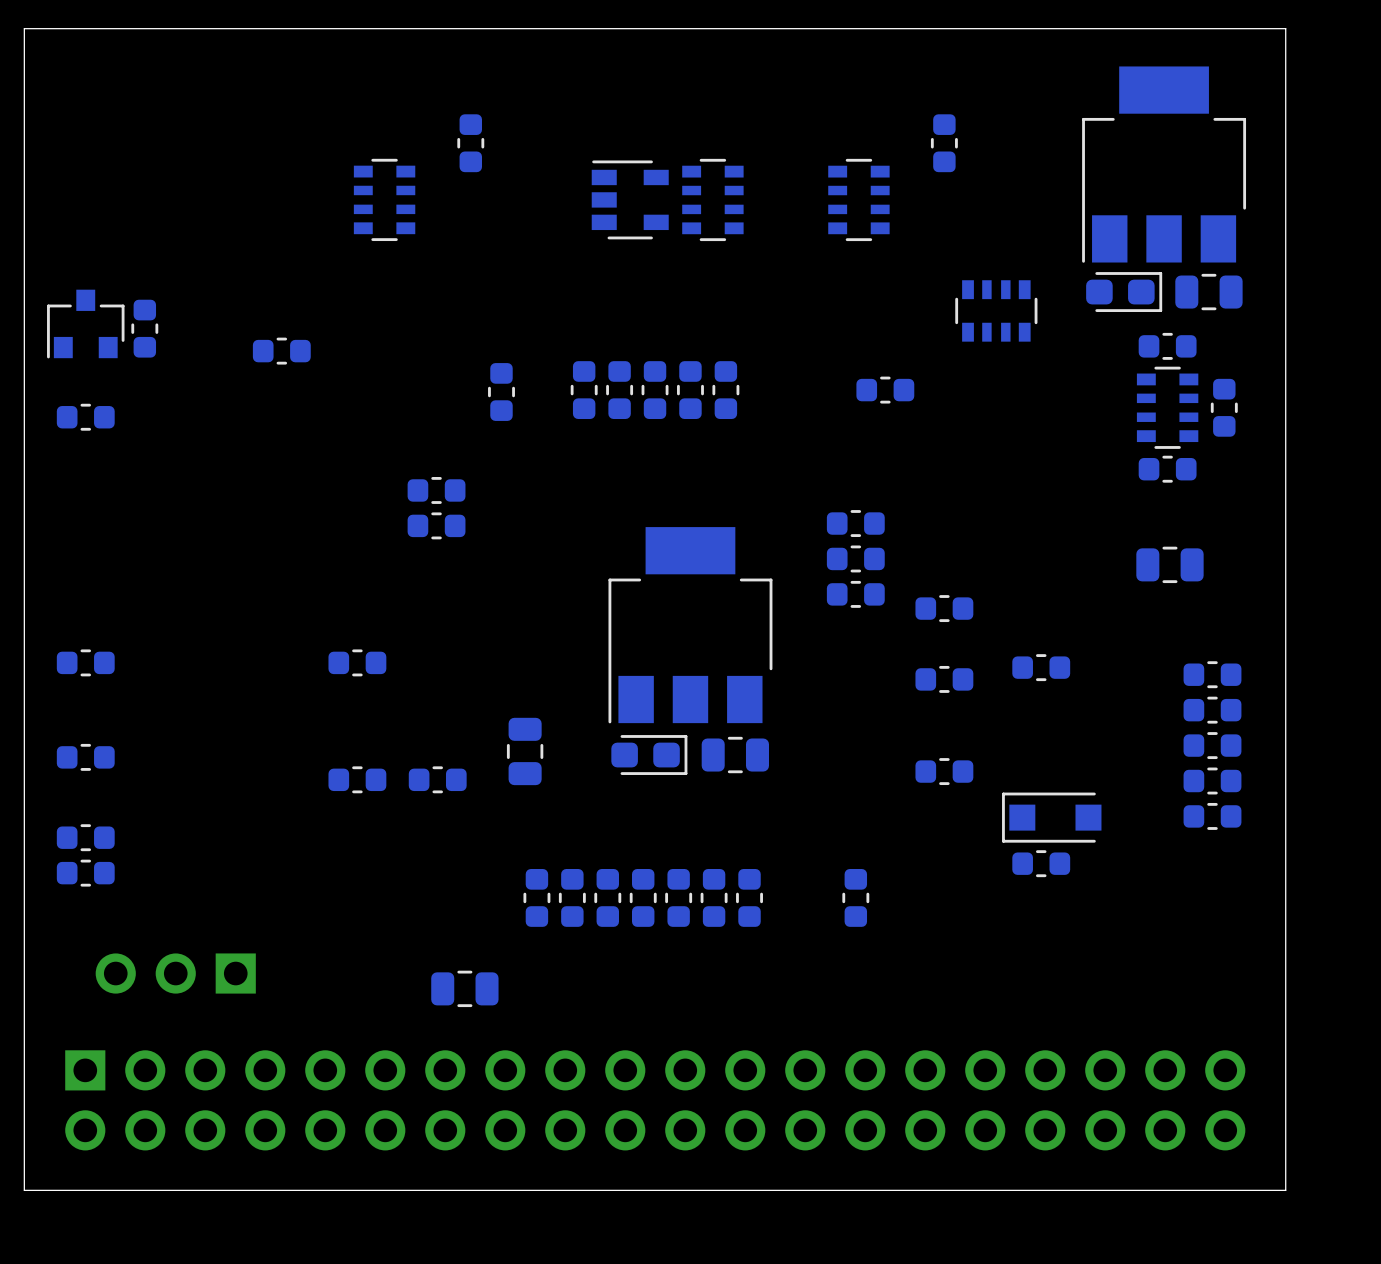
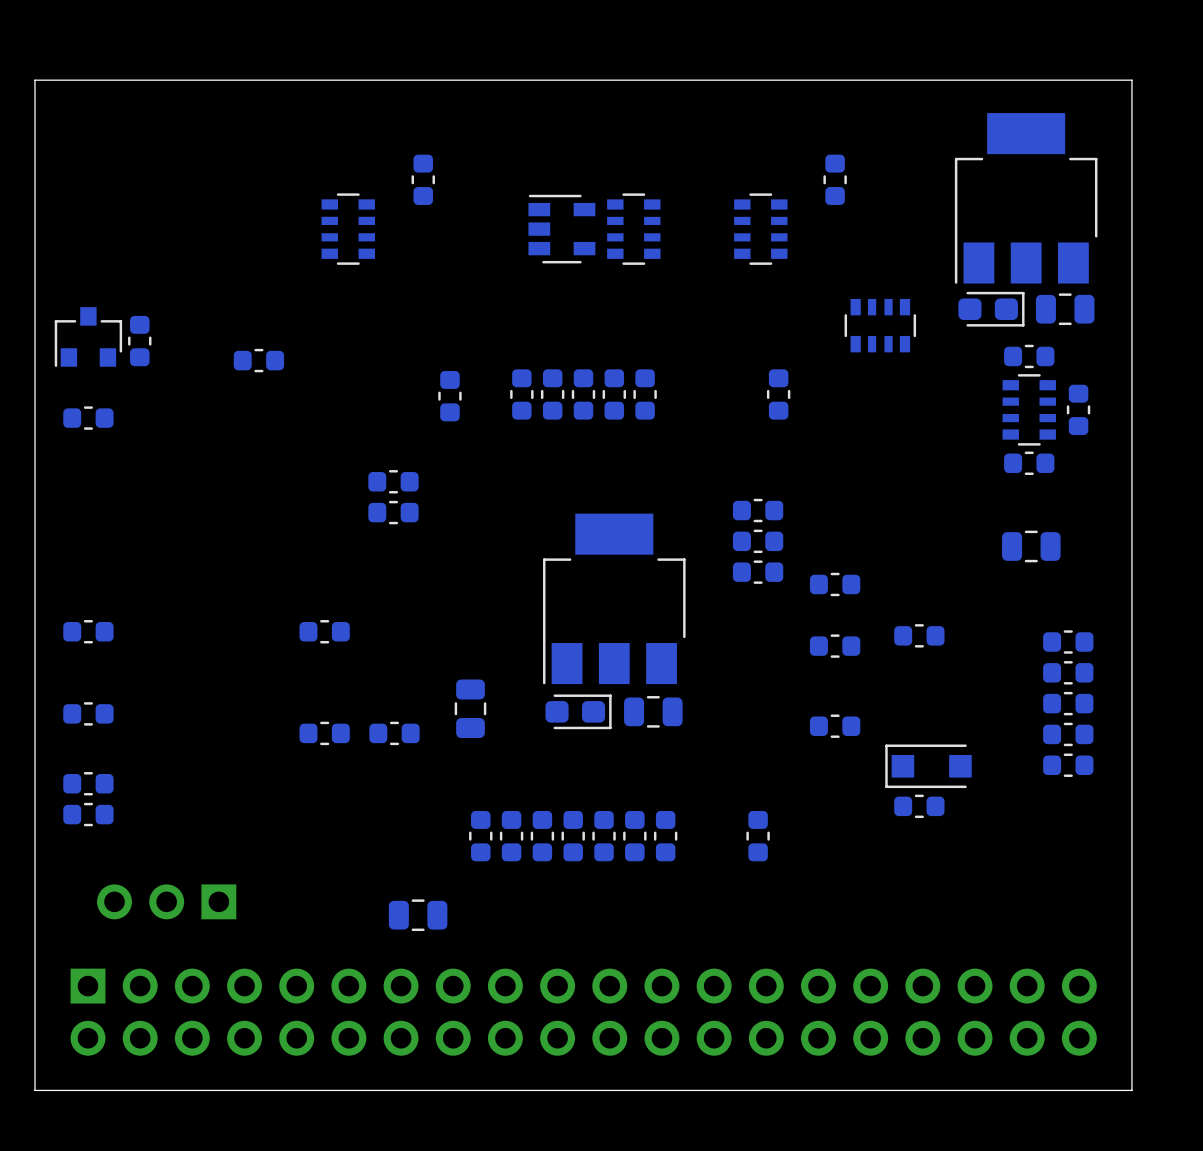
part rotation: 0° (885, 390) -> 90° clockwise (778, 394)

